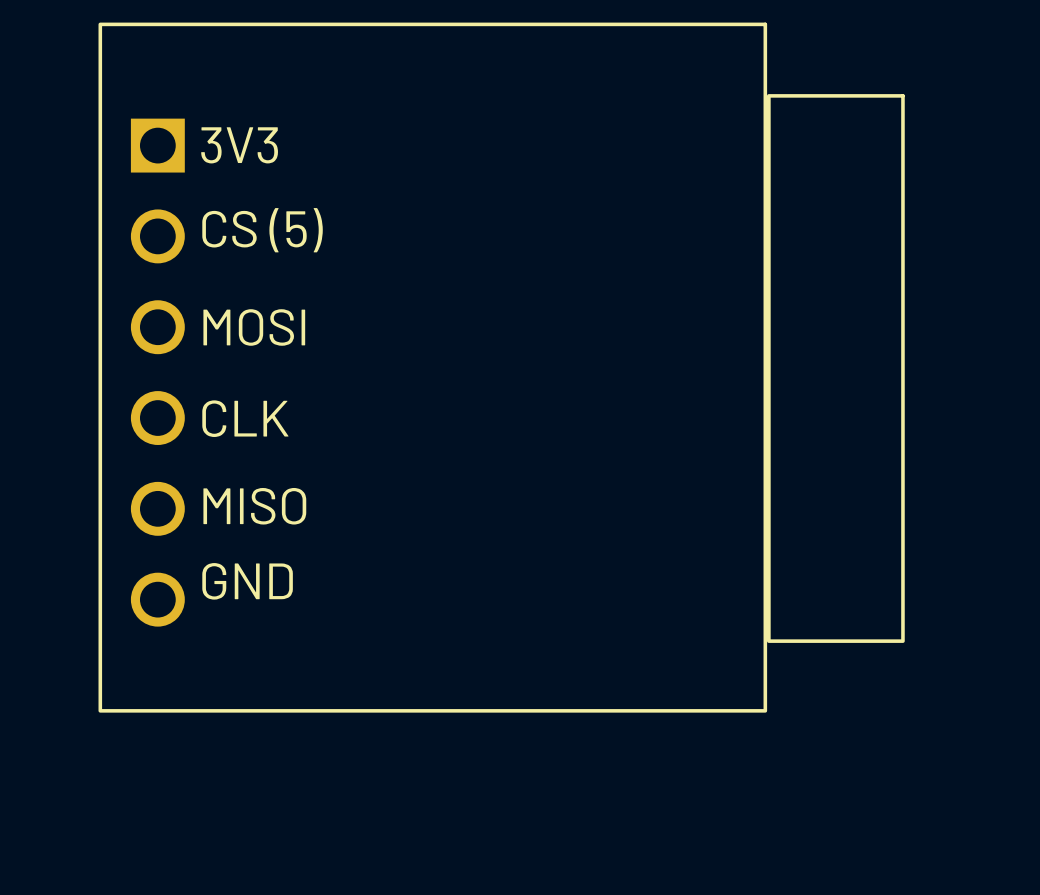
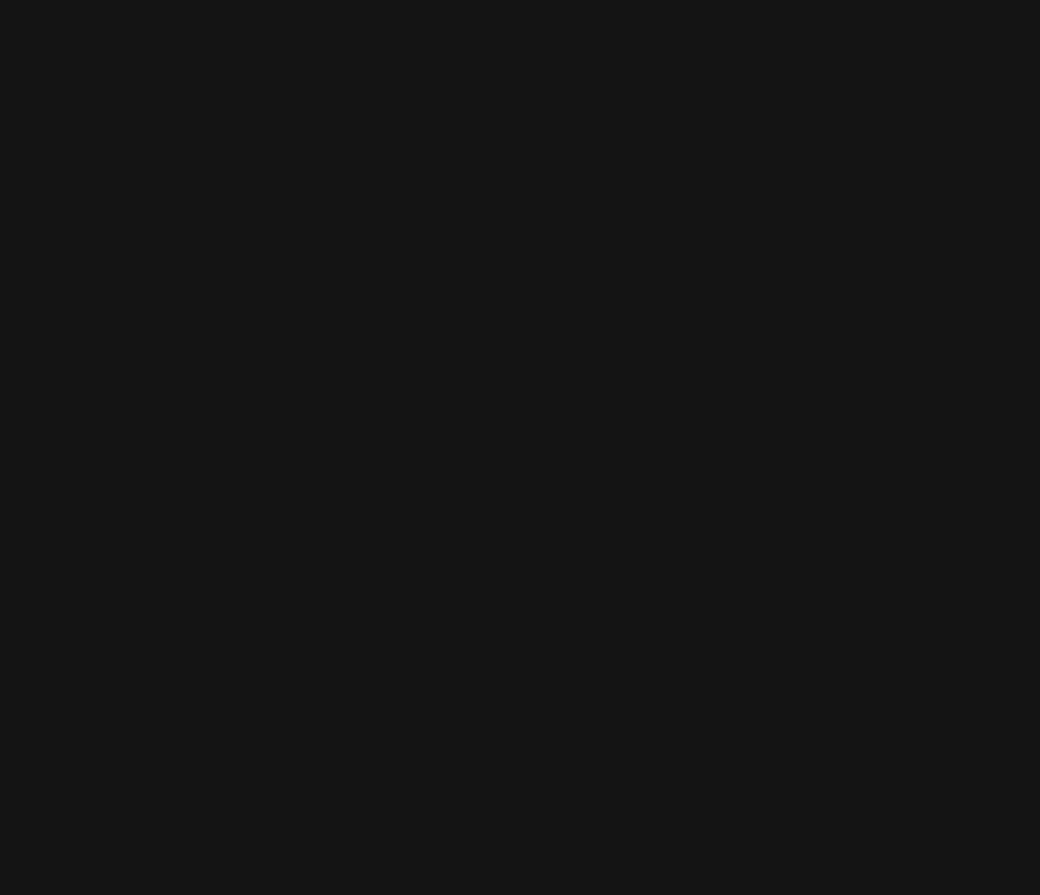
part: (501, 367) -> none

